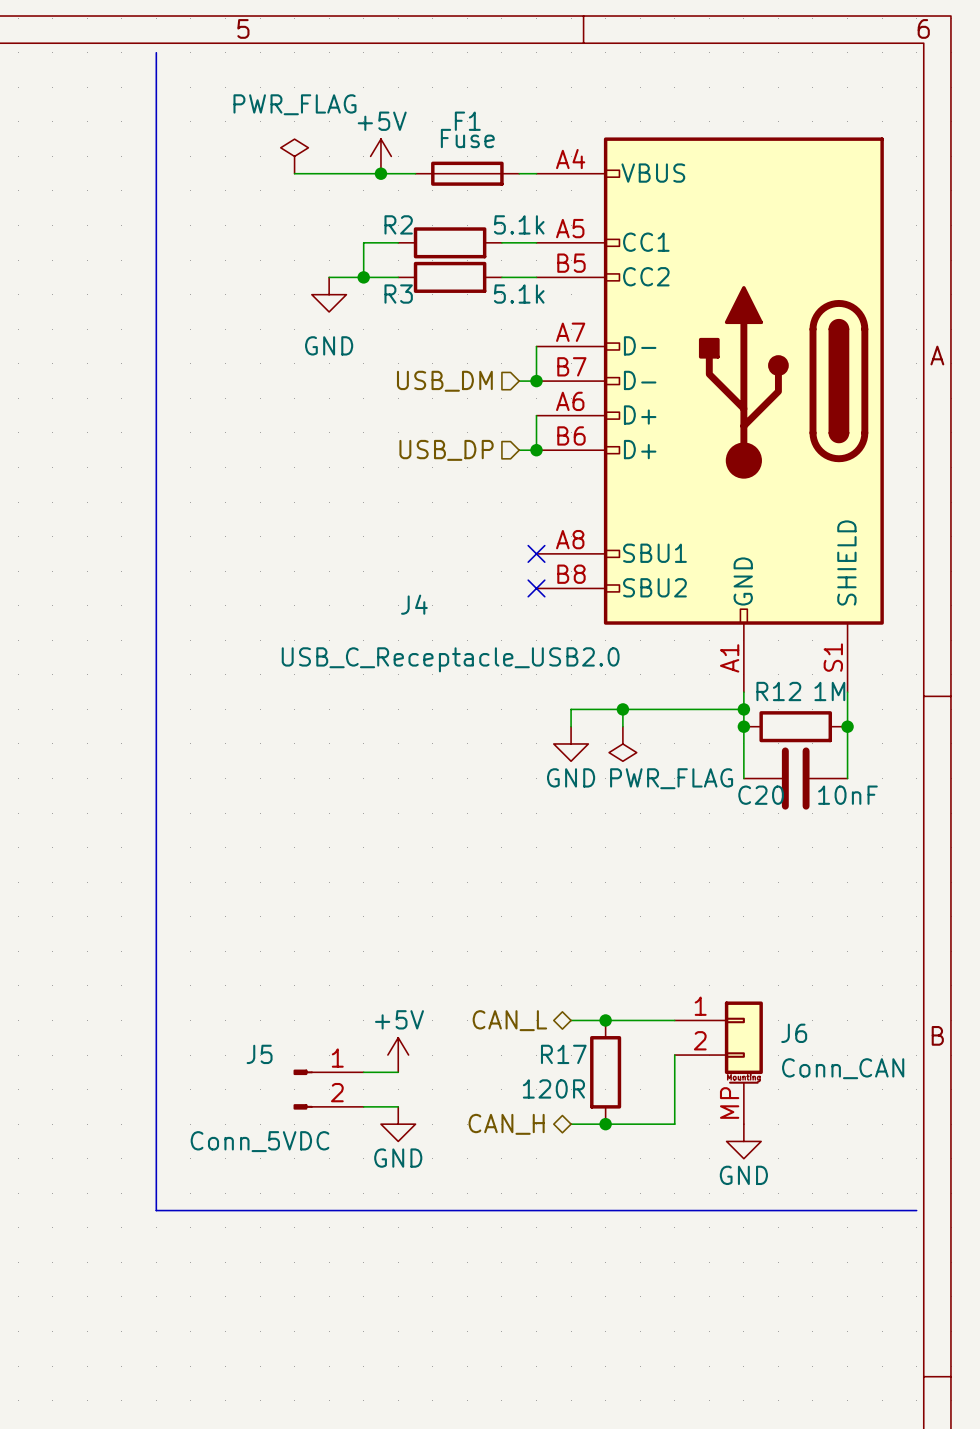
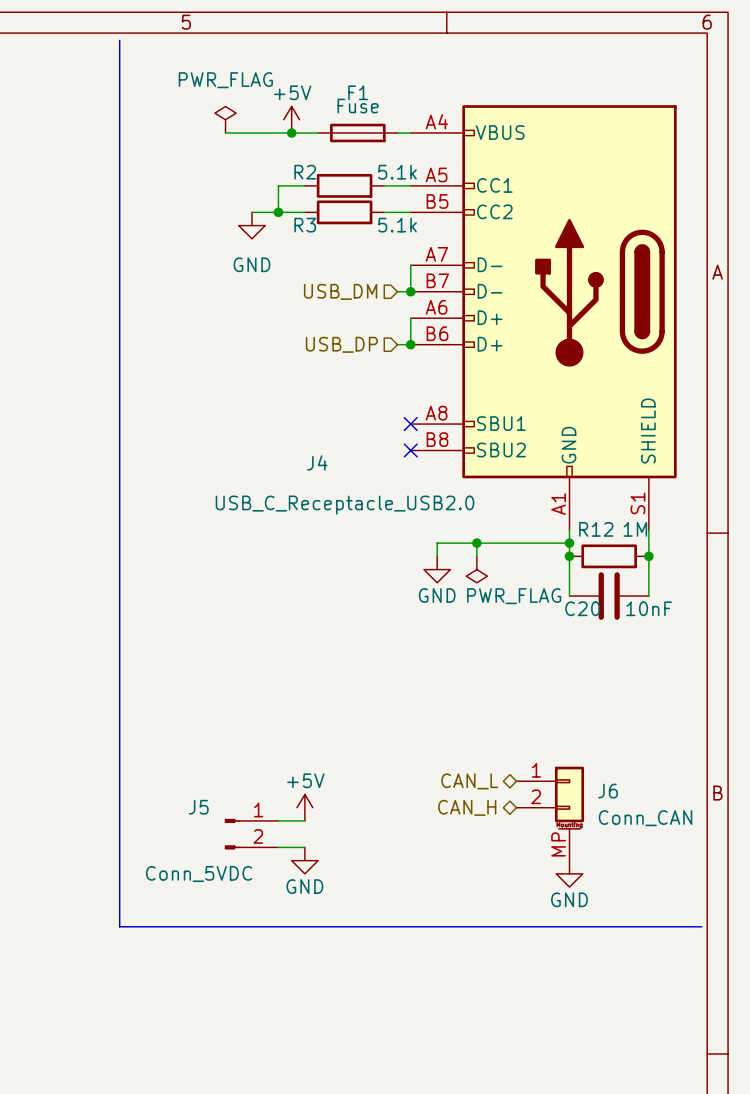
hierarchical label position: CAN_L (509, 1020) -> CAN_L (469, 781)
wire: (571, 1020) (674, 1020) -> none
junction: (605, 1020) -> none
wire: (674, 1055) (674, 1124) (571, 1124) -> none
R17: 120R (605, 1072) -> none
hierarchical label position: CAN_H (506, 1124) -> CAN_H (467, 807)
junction: (605, 1124) -> none

